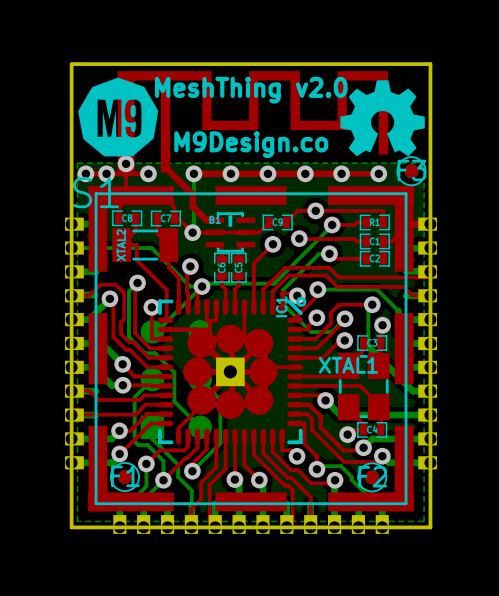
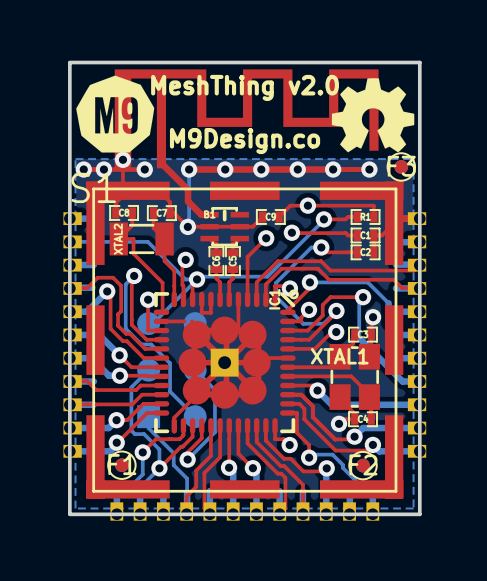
top track: (210, 320) (210, 329) (189, 329) -> none

